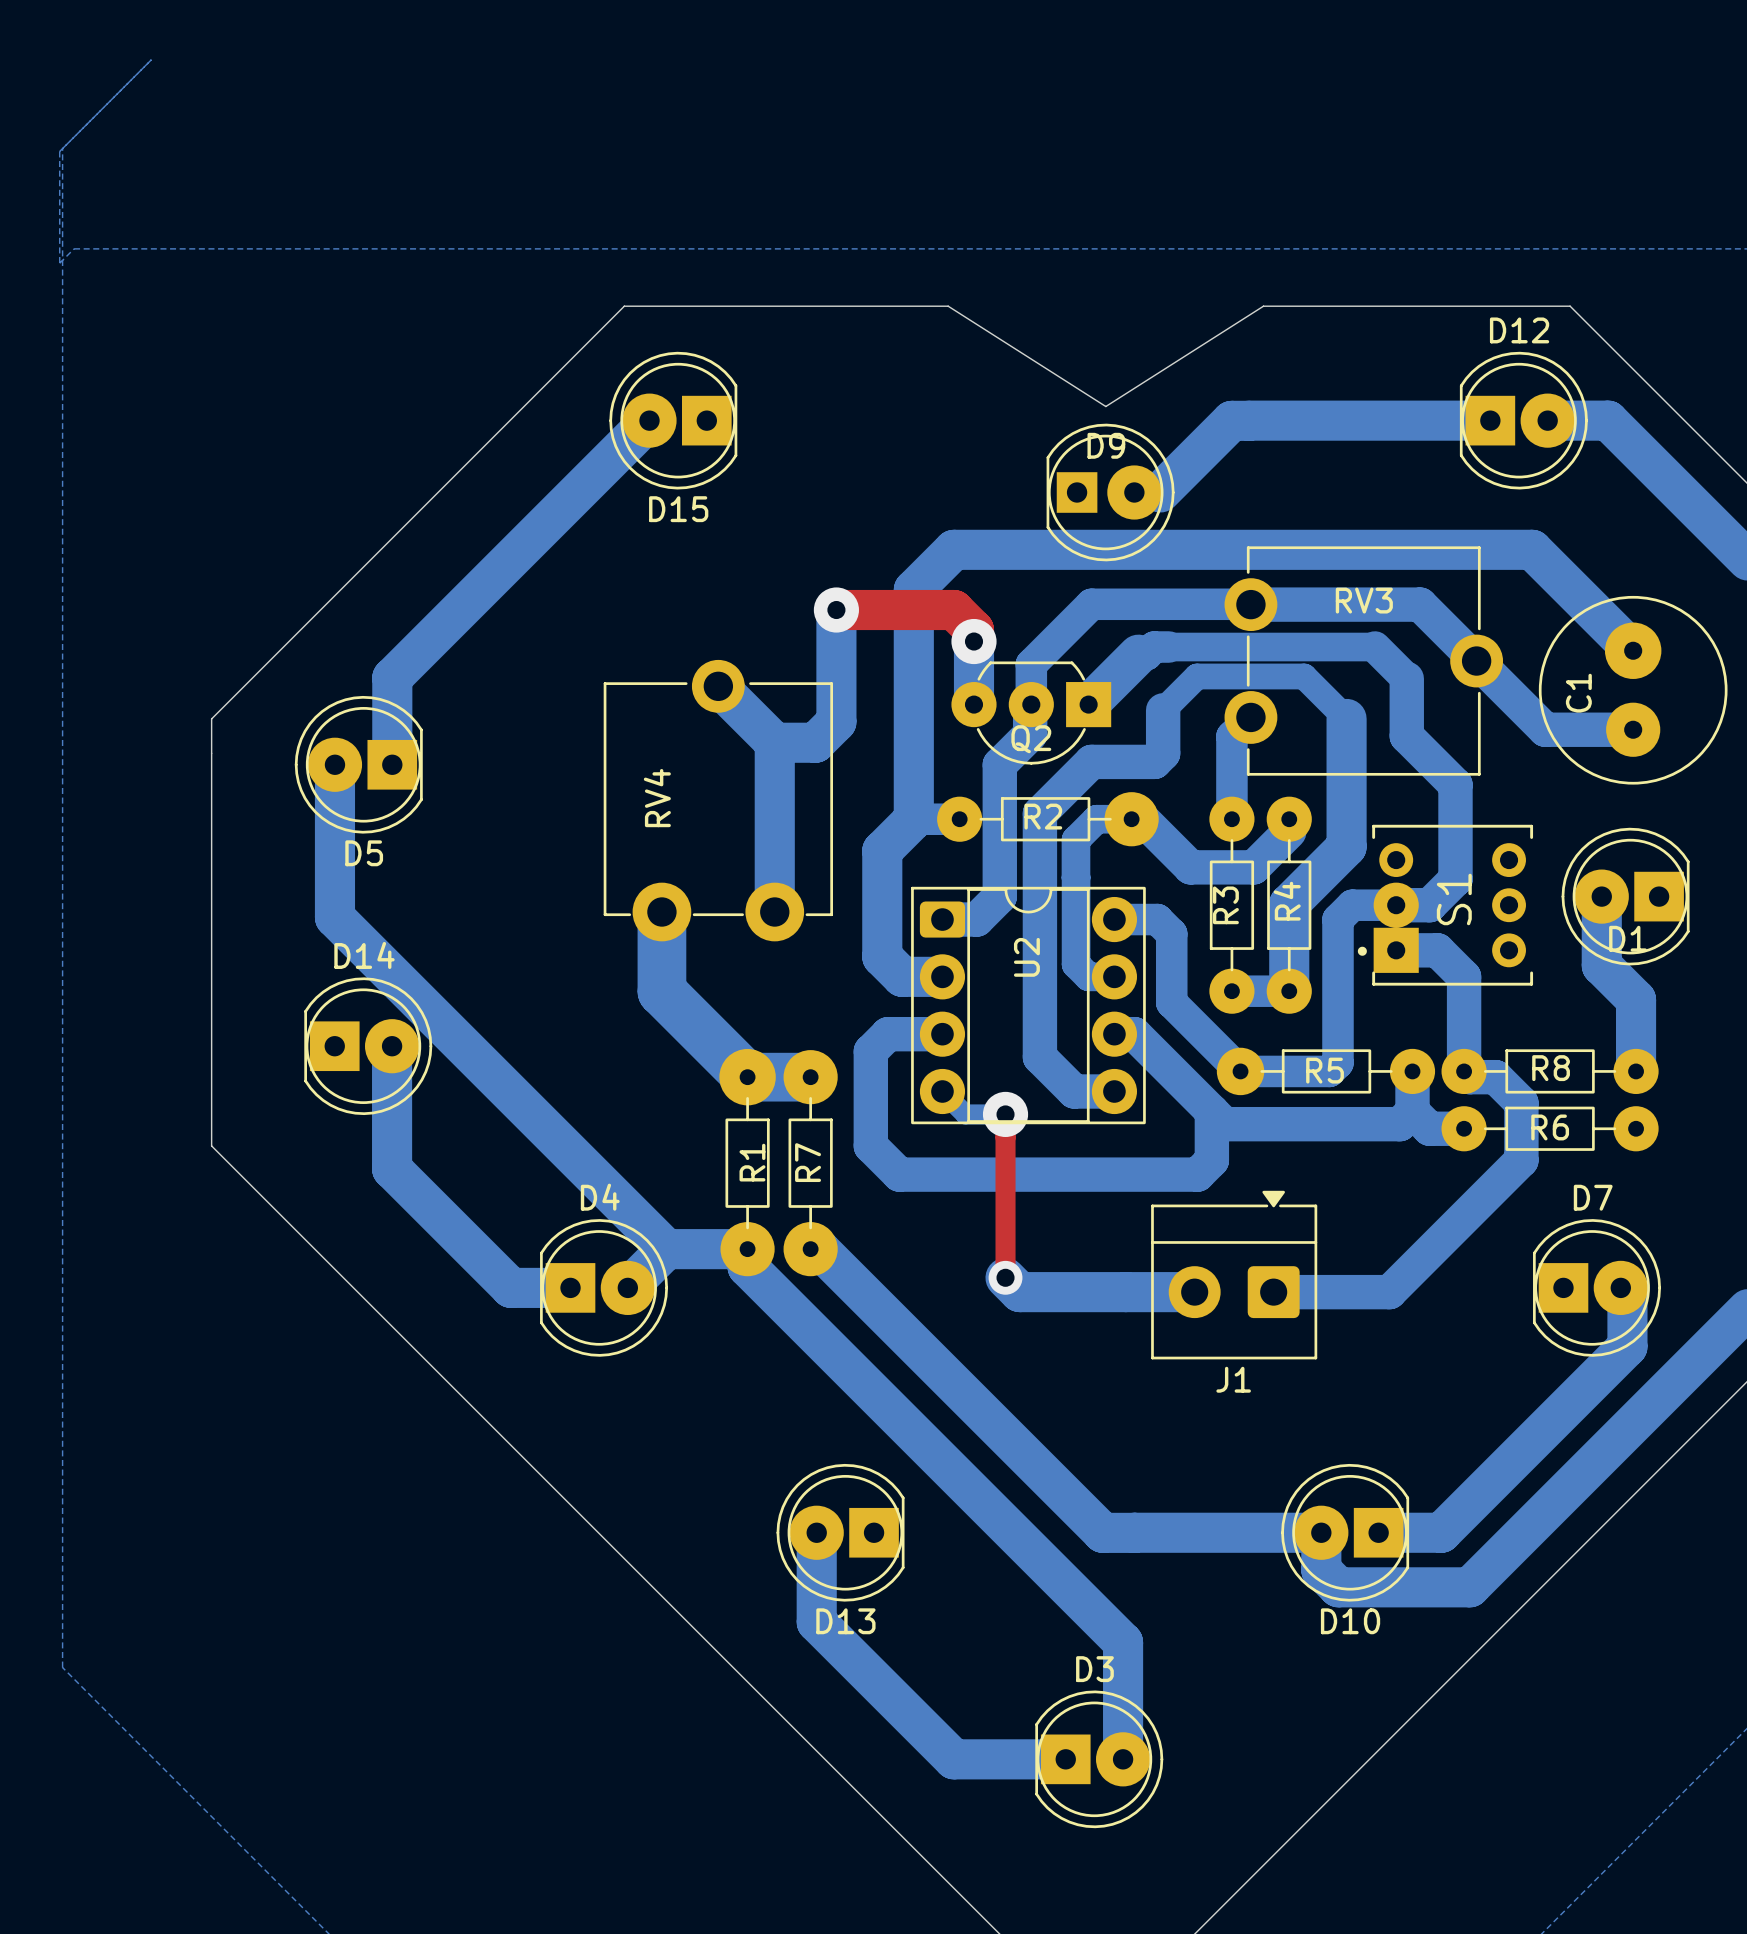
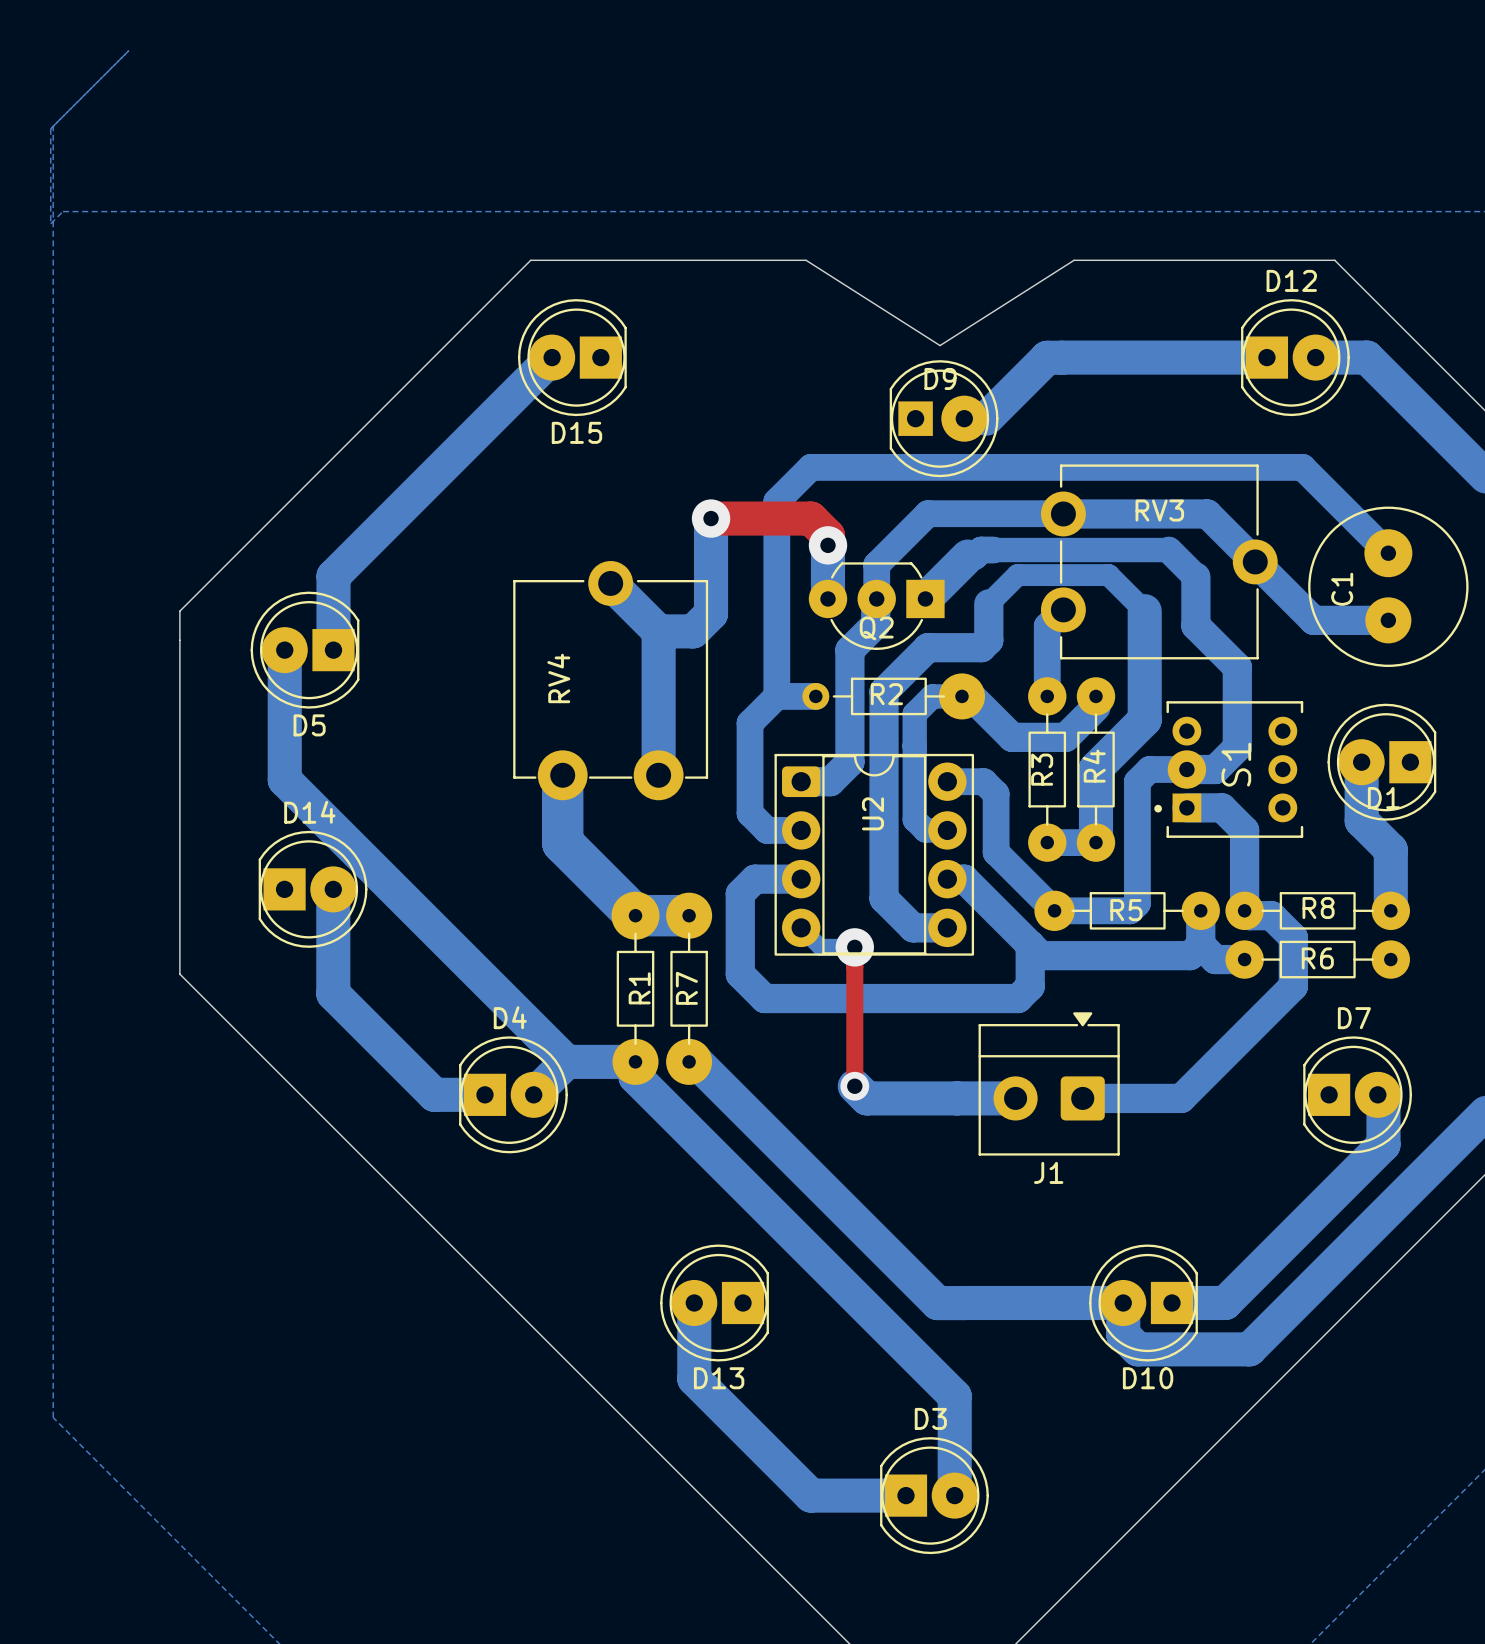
bottom track width: thick (1633, 650) (1532, 549) (953, 549) (913, 589) (913, 819) (882, 850) (882, 956) (902, 976) (942, 976) -> thin (1388, 553) (1302, 467) (810, 467) (776, 501) (776, 696) (750, 723) (750, 813) (767, 830) (801, 830)
R2 footprint: [937, 792, 1159, 847] -> [802, 673, 986, 720]
S1 footprint: [1357, 824, 1534, 986] -> [1154, 701, 1304, 838]

